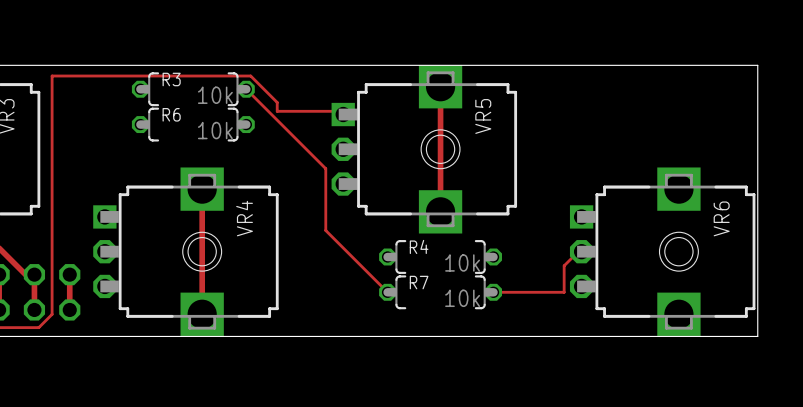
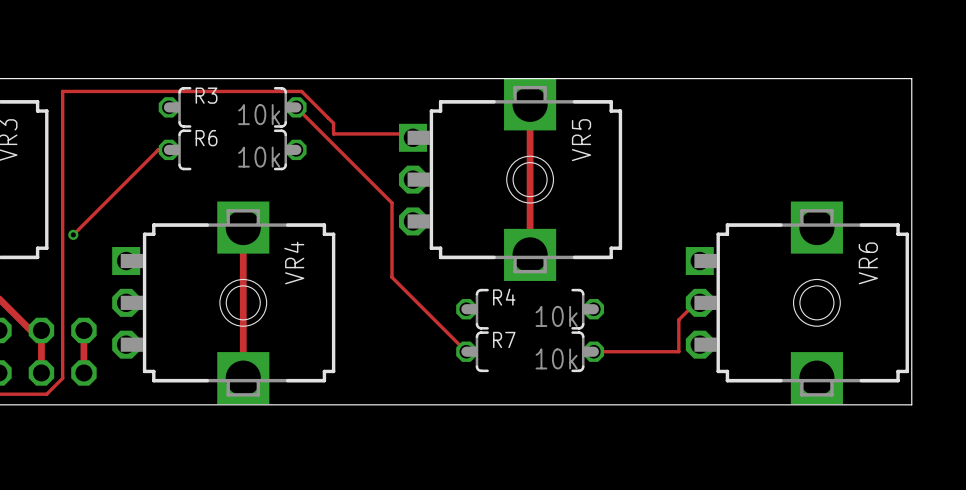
track: none -> (168, 149) (158, 149) (73, 234)
via: none -> (73, 234)

